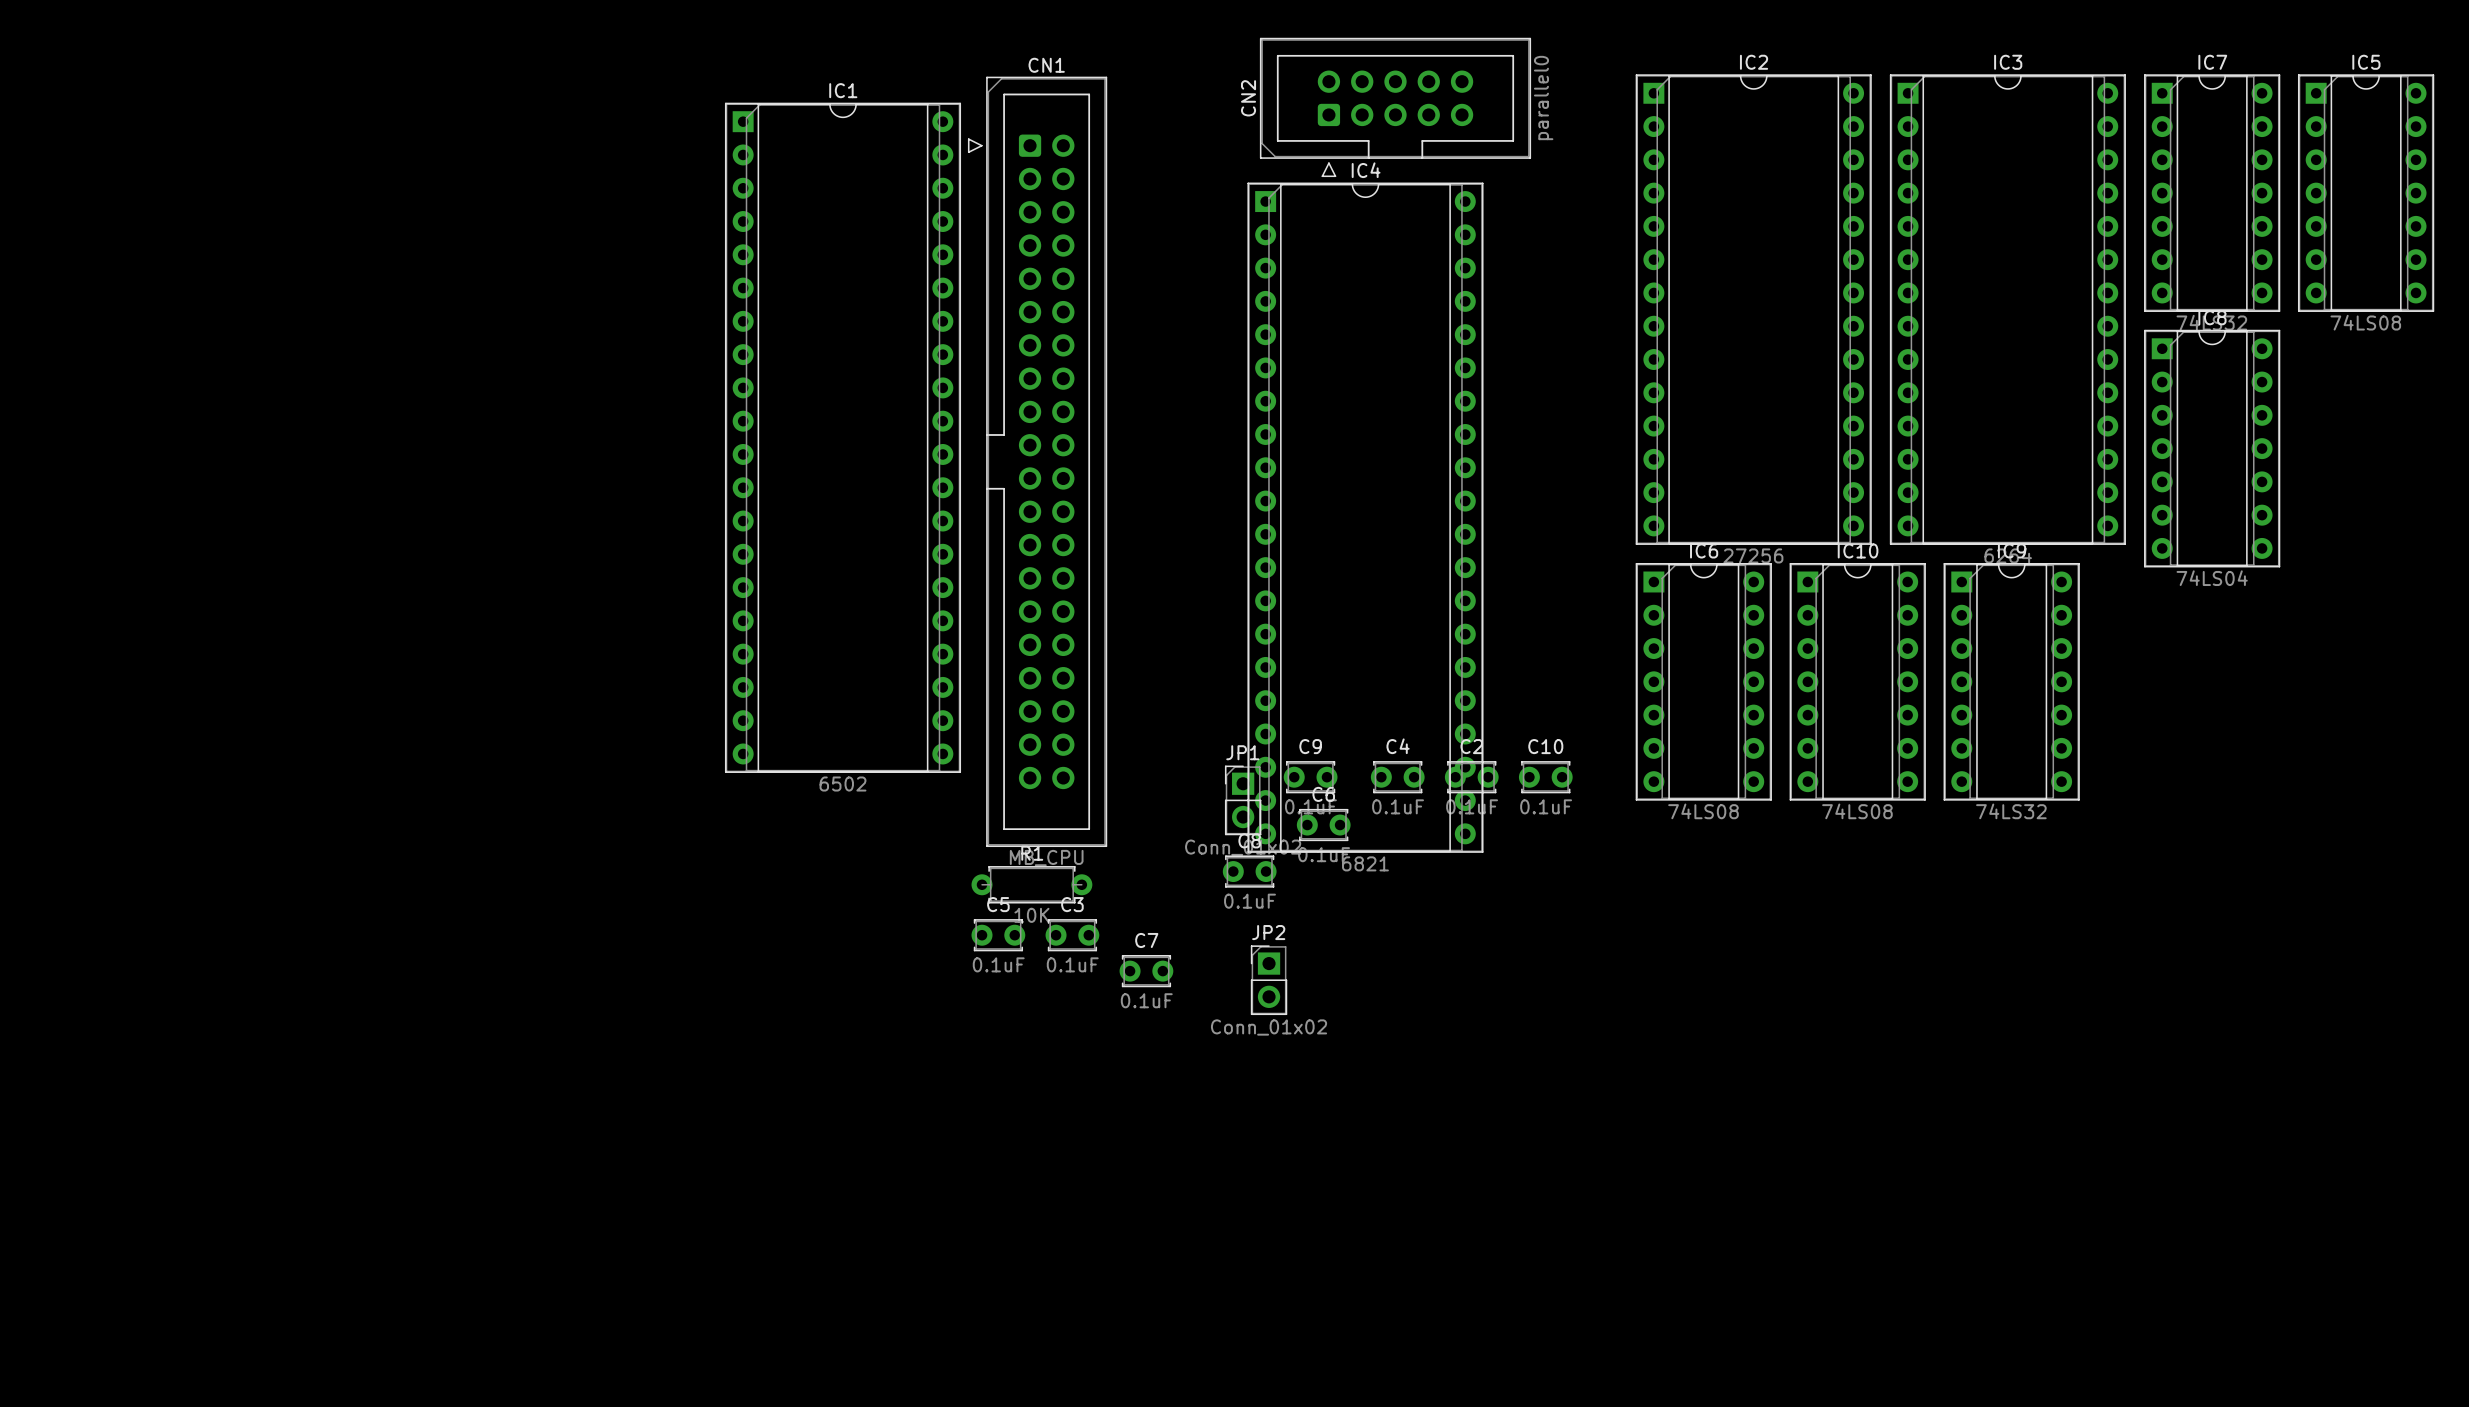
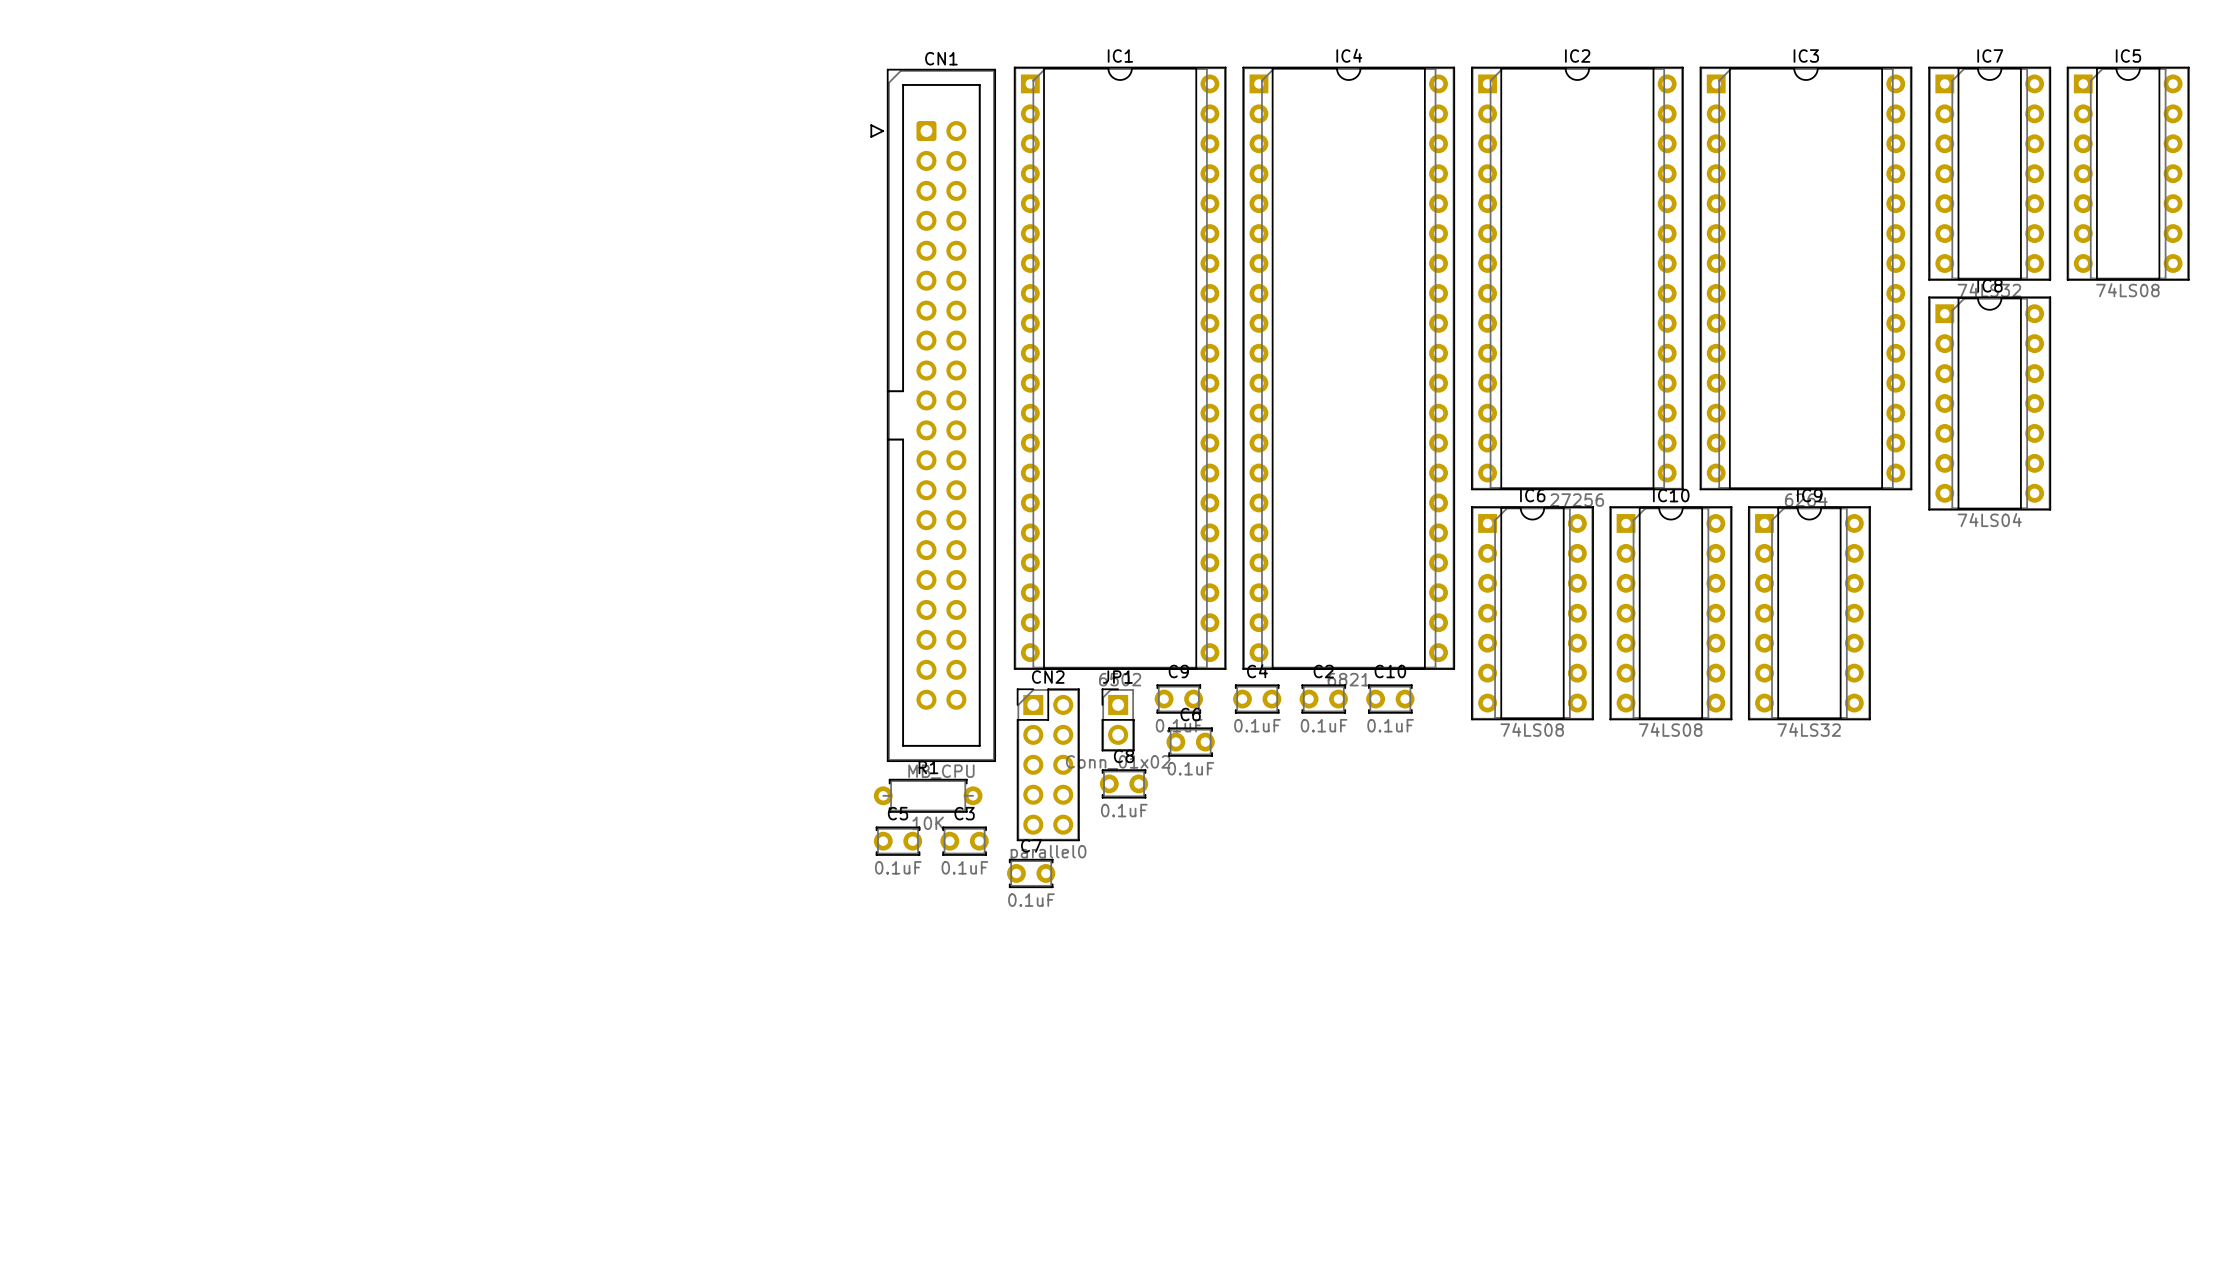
CN2 footprint: [1259, 37, 1532, 178] -> [1016, 688, 1080, 842]
CN2 name position: CN2 (1248, 98) -> CN2 (1048, 677)
CN2 value position: parallel0 (1543, 98) -> parallel0 (1048, 853)
IC1 position: (842, 437) -> (1120, 368)
IC4 position: (1365, 517) -> (1348, 368)
JP2: Conn_01x02 (1269, 980) -> none

